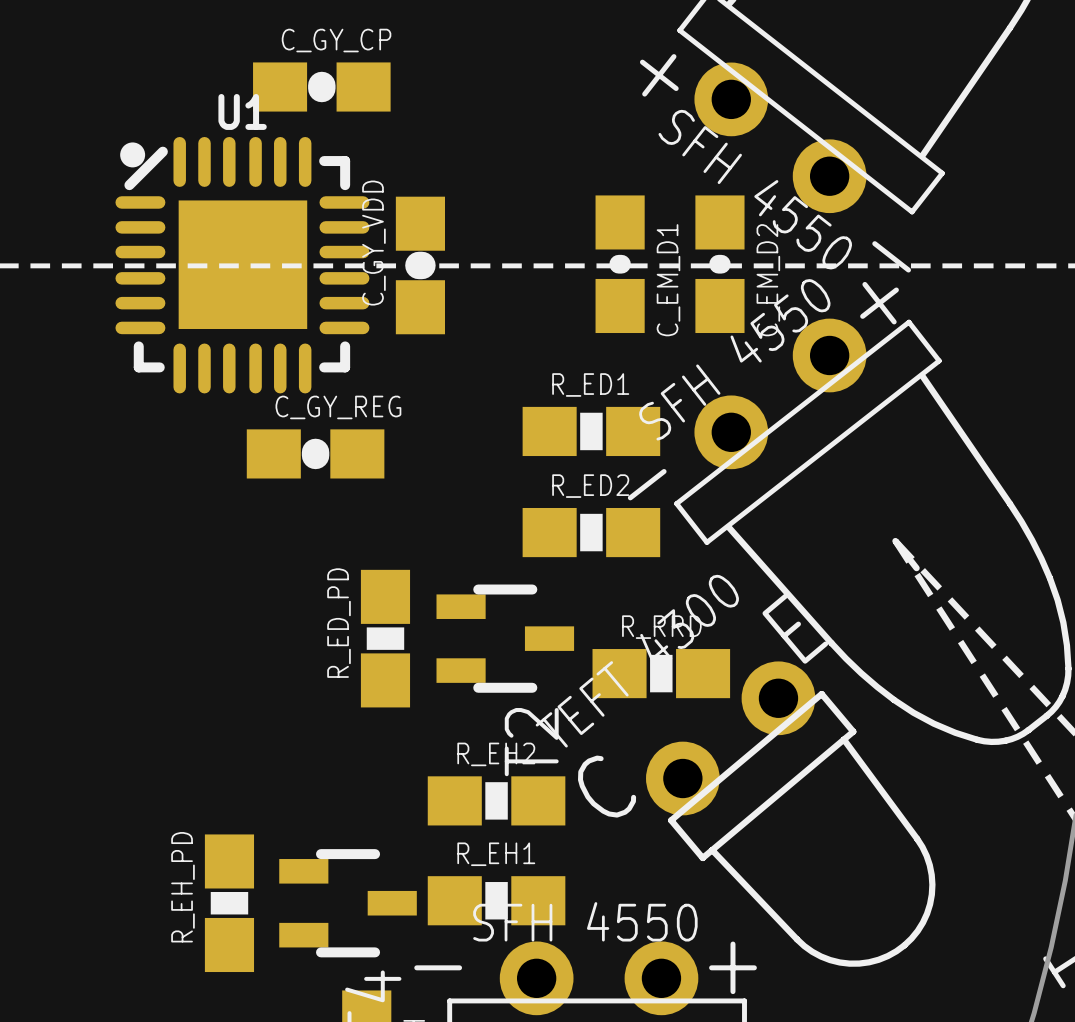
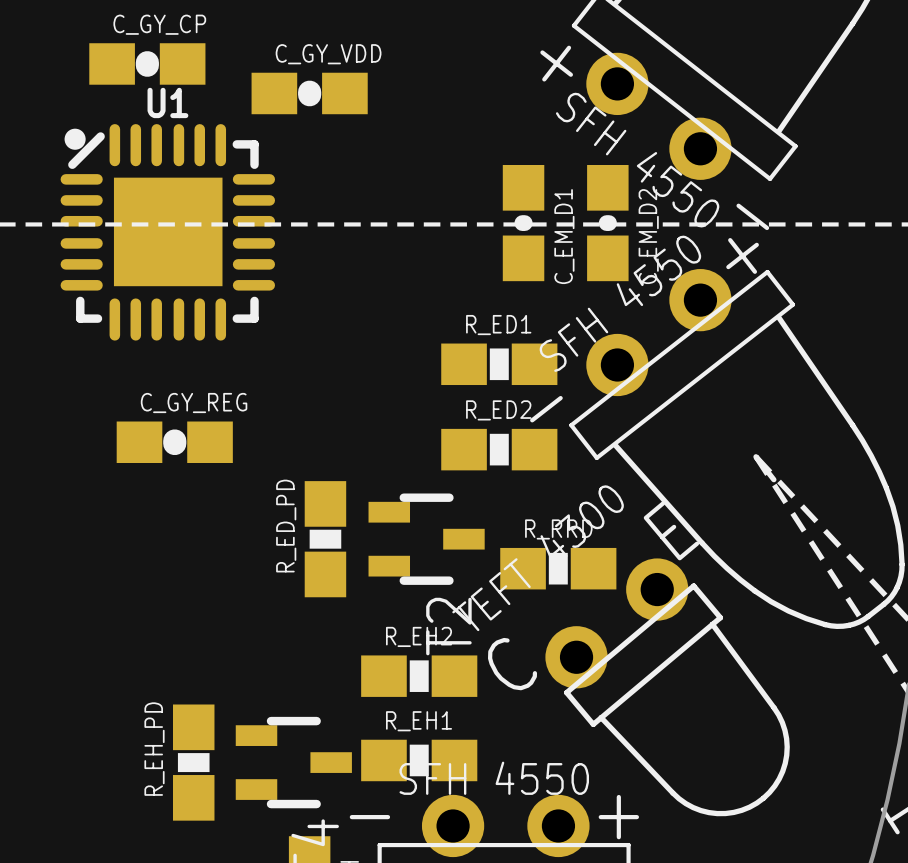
C_GY_CP position: (321, 87) -> (147, 63)
U1 position: (242, 265) -> (167, 232)
C_GY_VDD rotation: 0° (420, 265) -> 90° clockwise (309, 93)
C_GY_VDD position: (420, 265) -> (309, 93)
C_GY_REG position: (315, 453) -> (174, 442)

